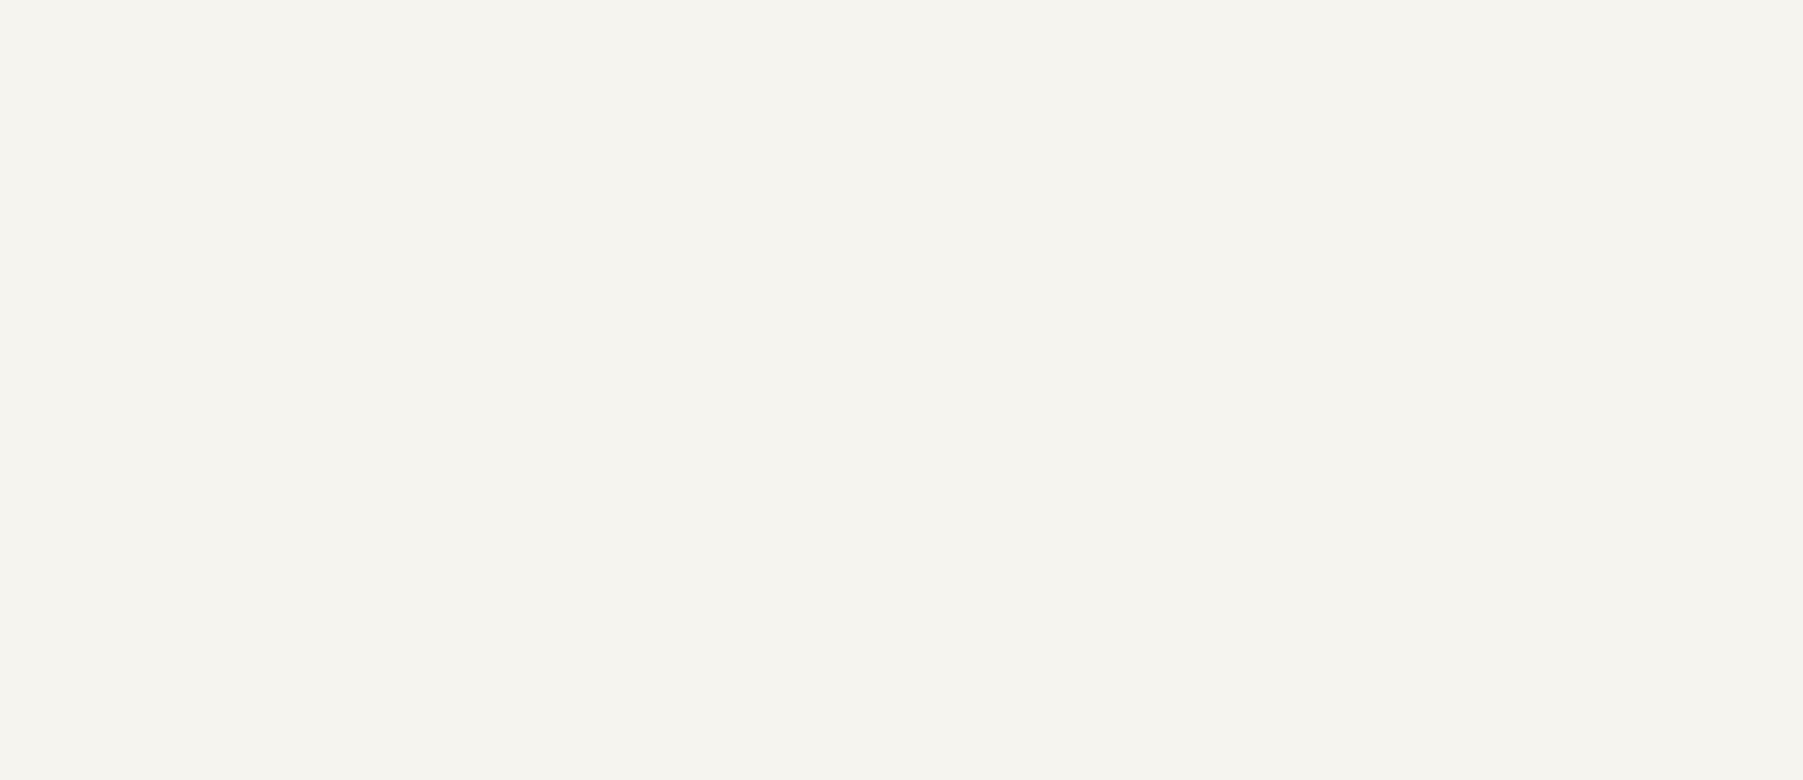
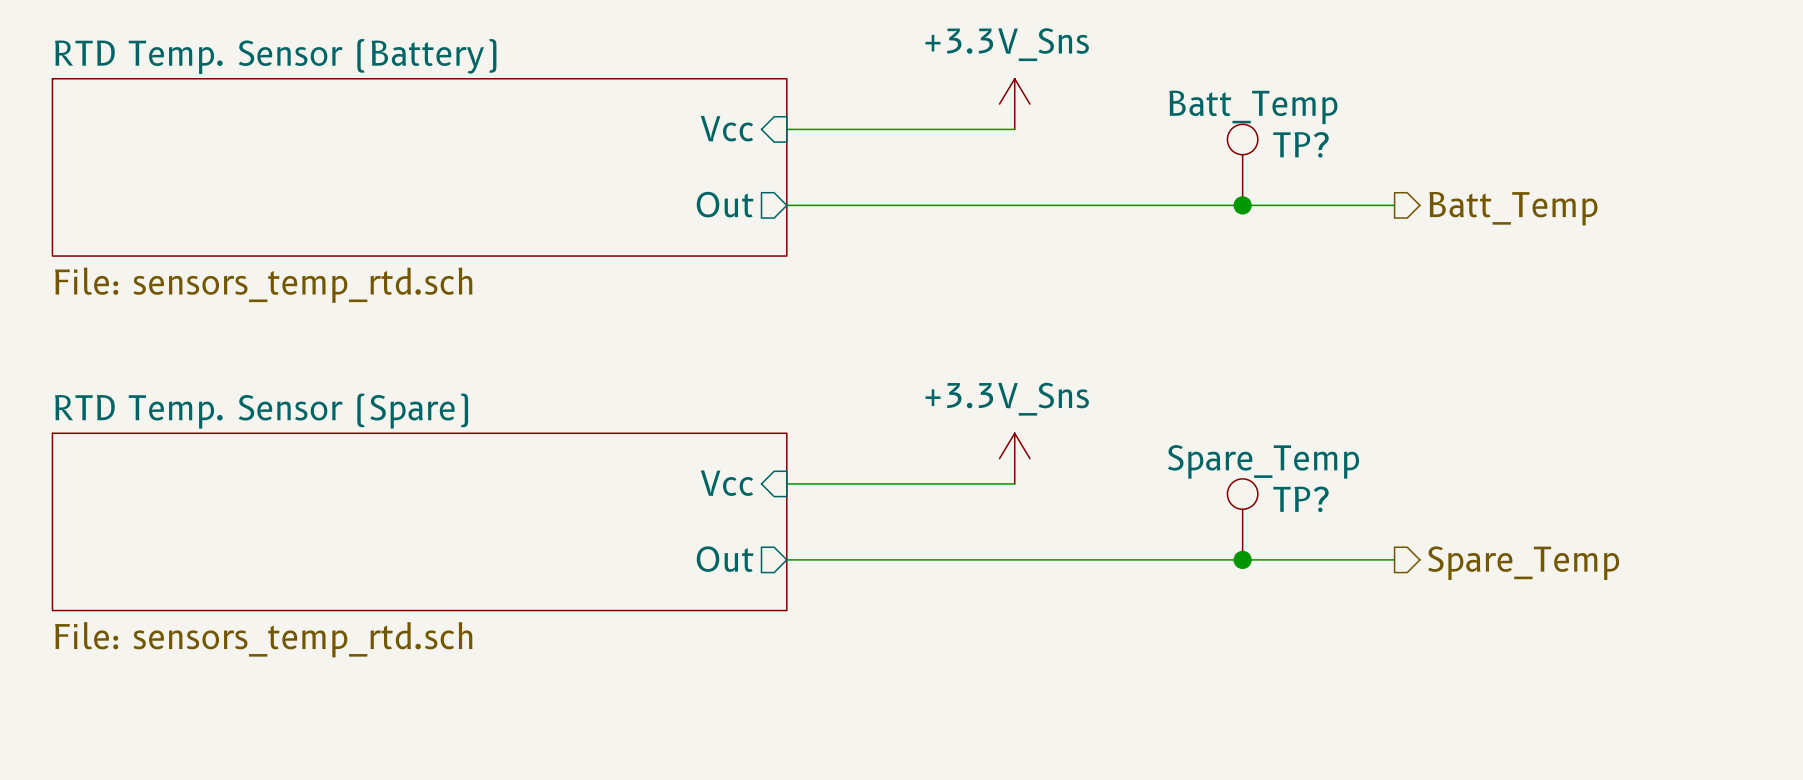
power symbol: none -> +3.3V_Sns (1014, 104)
sheet pin: none -> Vcc (726, 128)
wire: none -> (786, 129) (1014, 129)
TP?: none -> Batt_Temp (1242, 164)
sheet RTD Temp. Sensor (Battery): none -> File: sensors_temp_rtd.sch (419, 167)
sheet pin: none -> Out (725, 204)
wire: none -> (786, 205) (1394, 205)
junction: none -> (1242, 205)
hierarchical label: none -> Batt_Temp (1513, 208)
power symbol: none -> +3.3V_Sns (1014, 458)
sheet pin: none -> Vcc (726, 483)
wire: none -> (786, 483) (1014, 483)
TP?: none -> Spare_Temp (1242, 519)
sheet RTD Temp. Sensor (Spare): none -> File: sensors_temp_rtd.sch (419, 521)
sheet pin: none -> Out (725, 559)
wire: none -> (786, 559) (1394, 559)
junction: none -> (1242, 559)
hierarchical label: none -> Spare_Temp (1523, 563)

